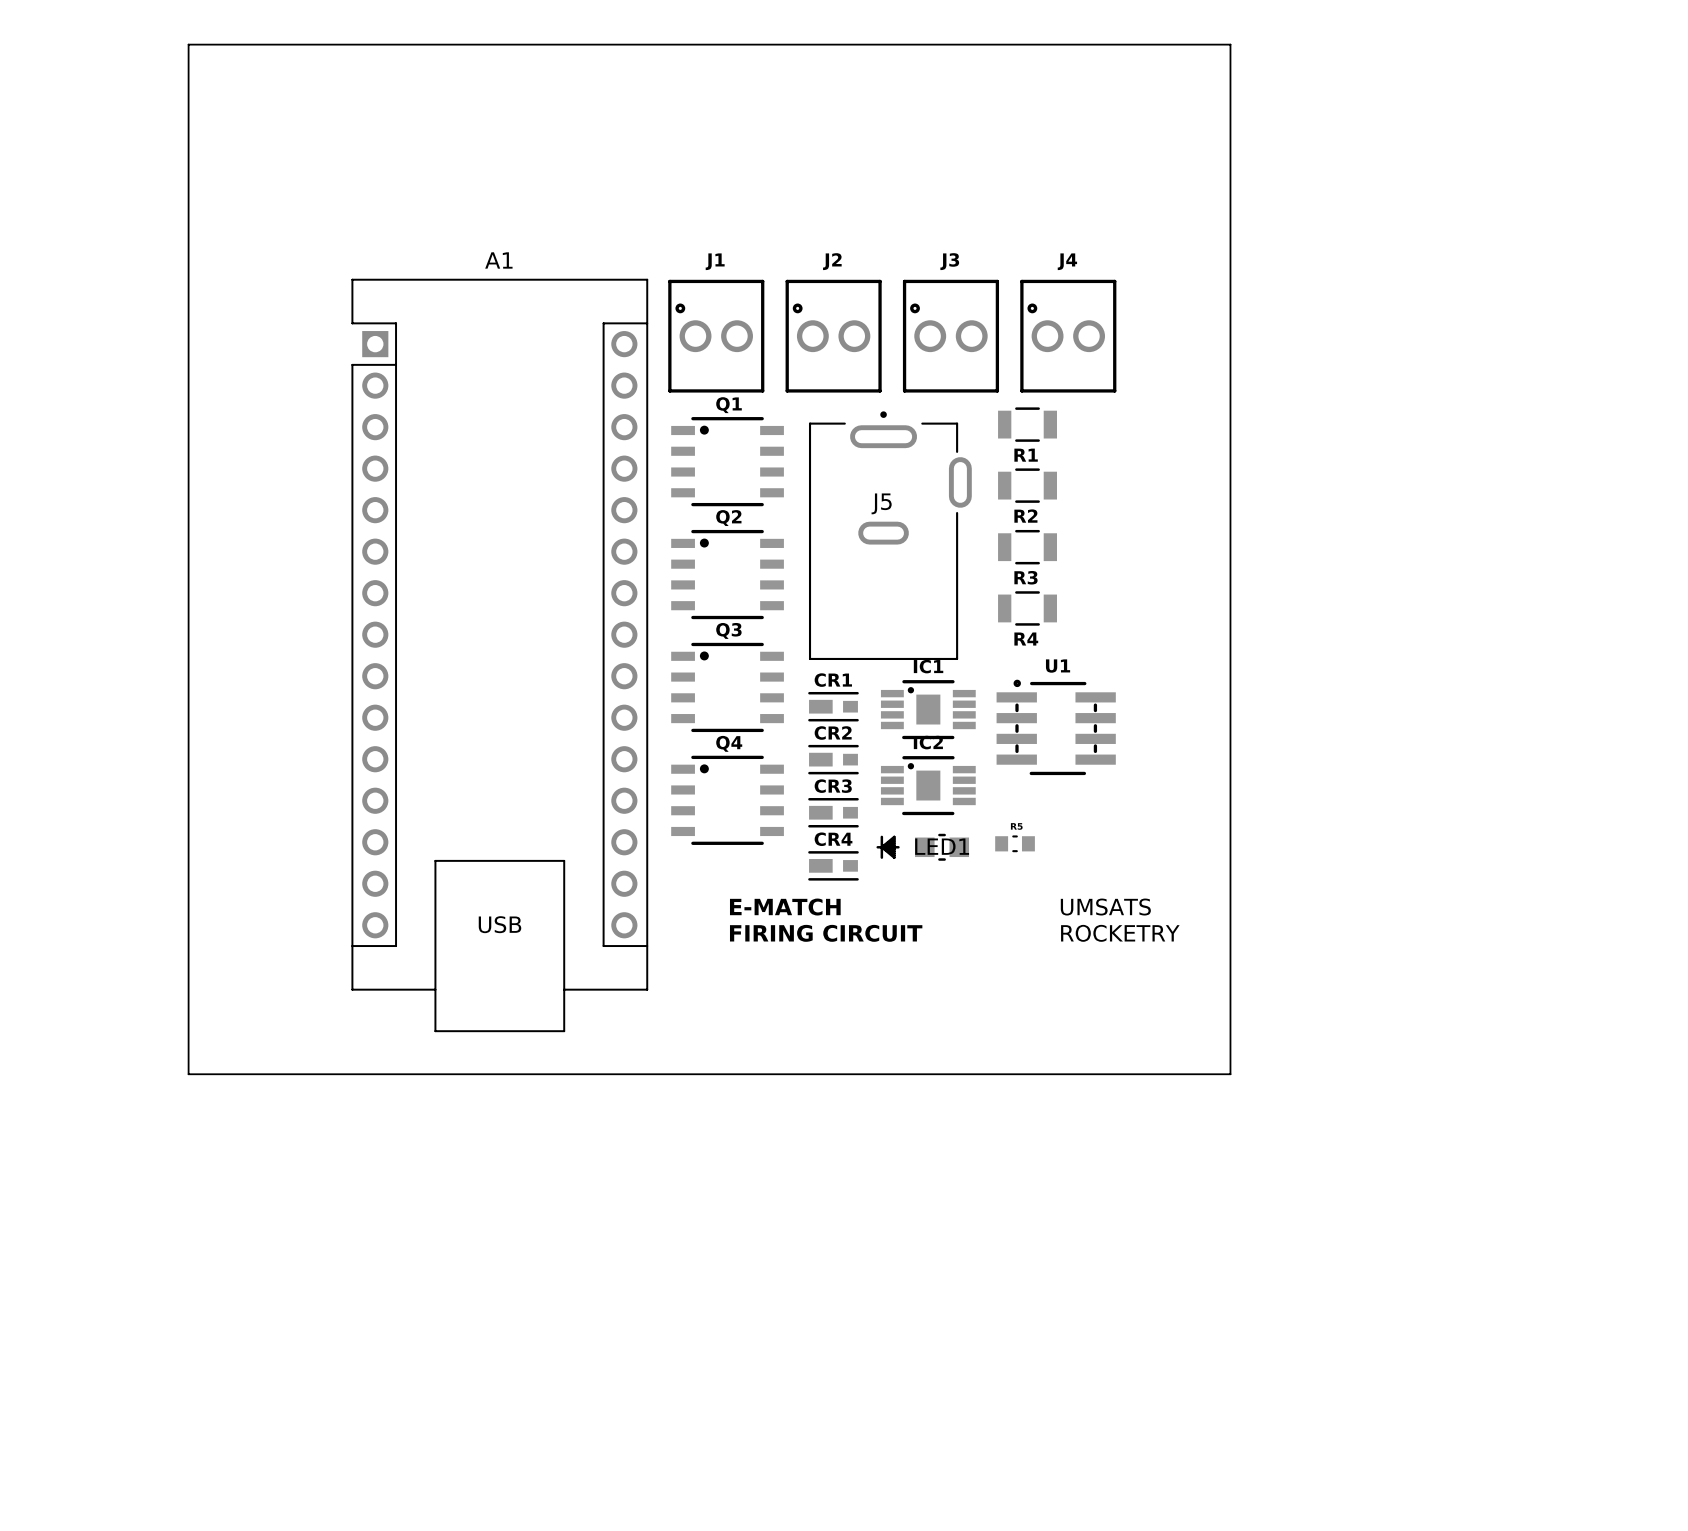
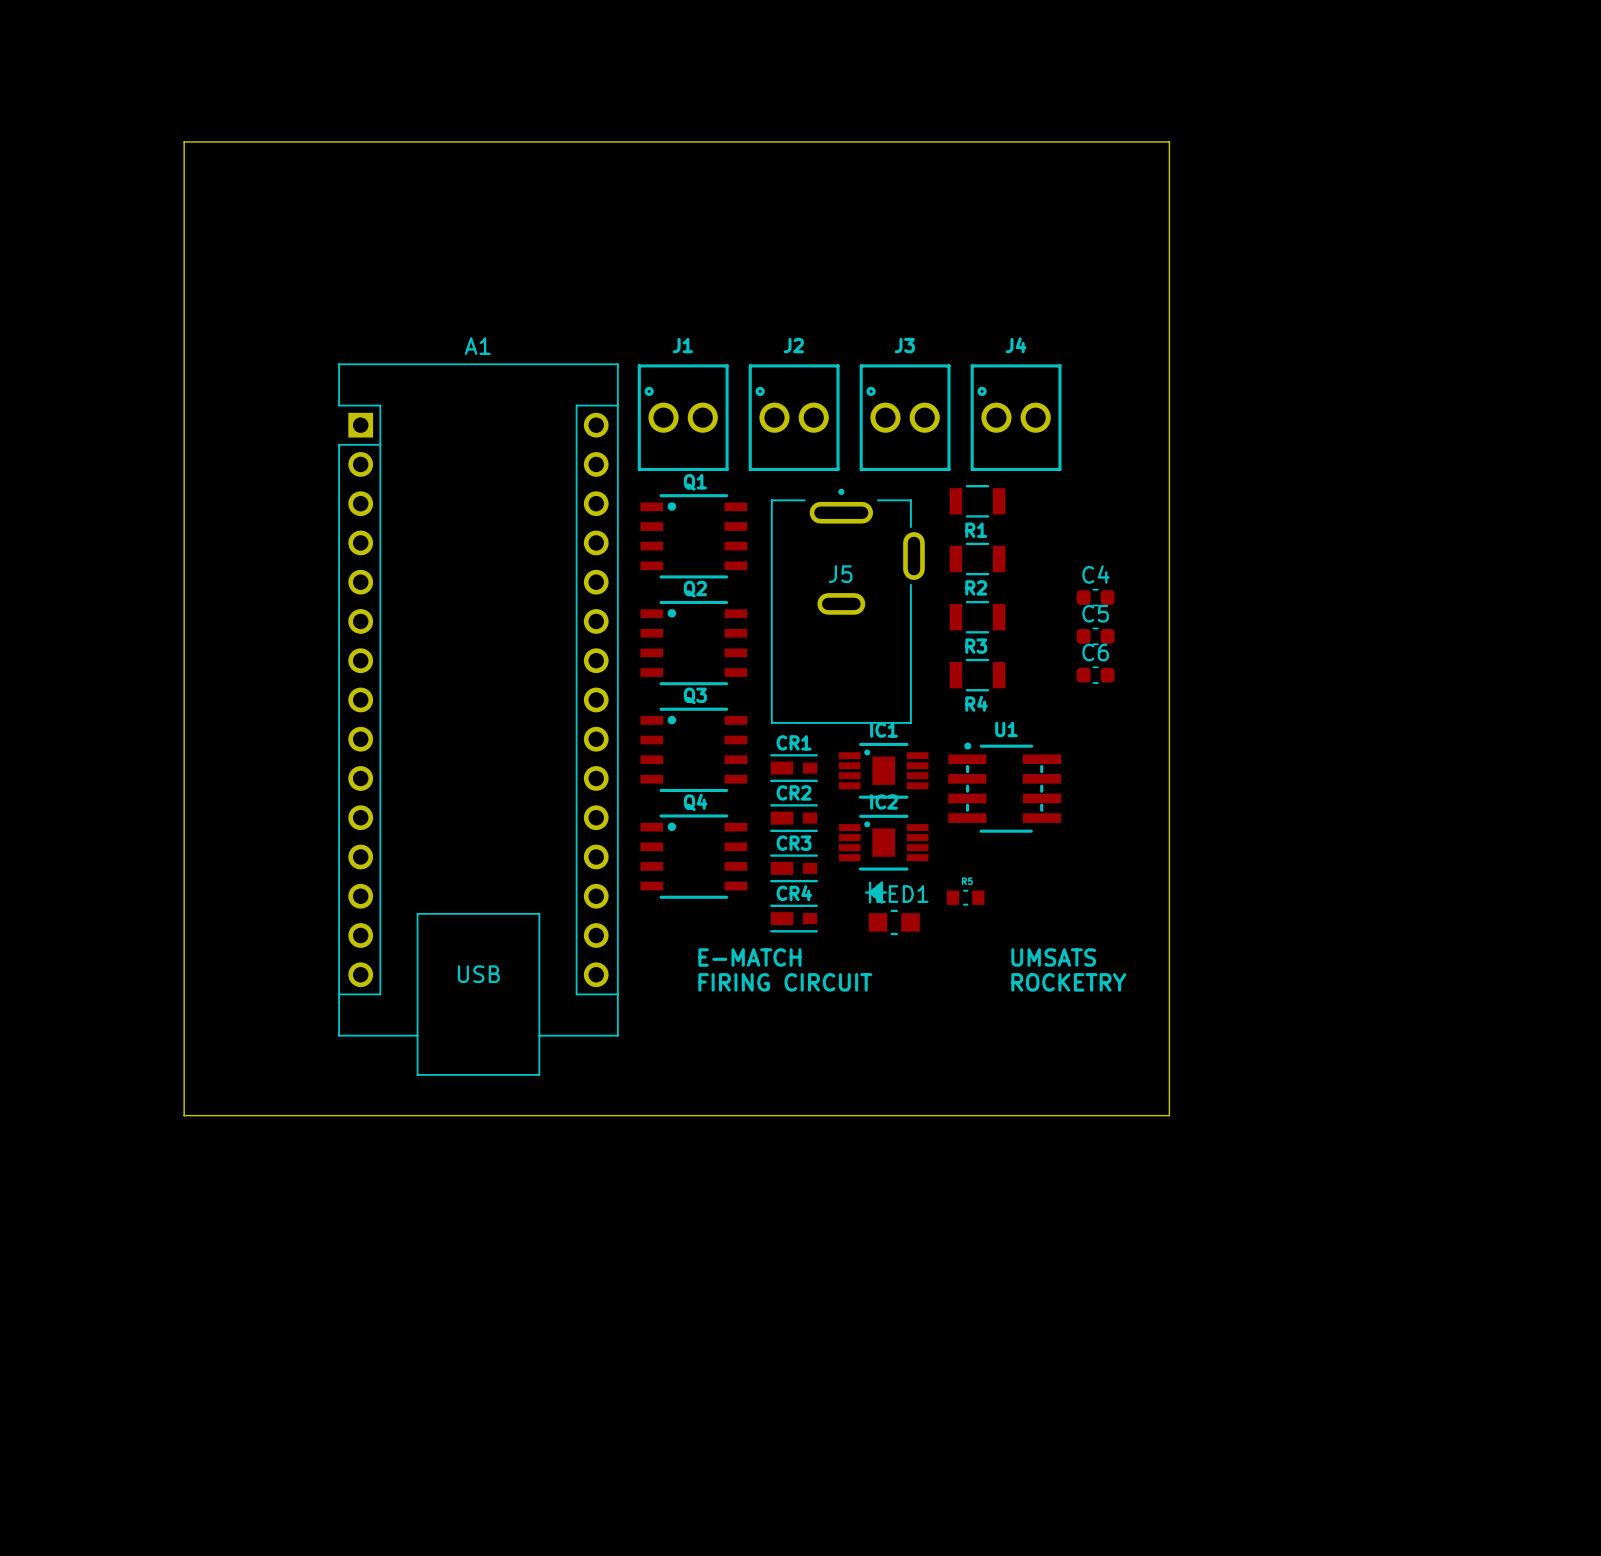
C4: none -> (1095, 597)
C5: none -> (1095, 636)
C6: none -> (1095, 675)
LED1 footprint: [876, 833, 970, 861] -> [865, 881, 920, 936]

